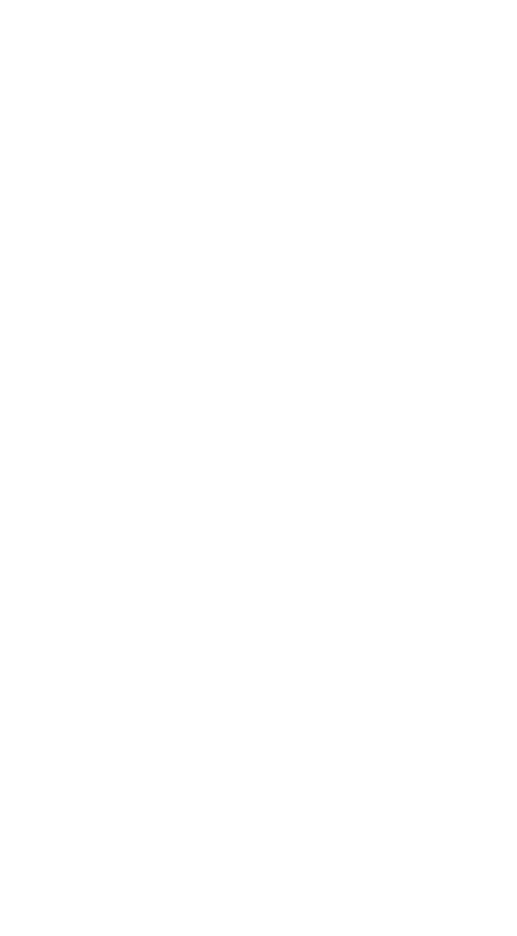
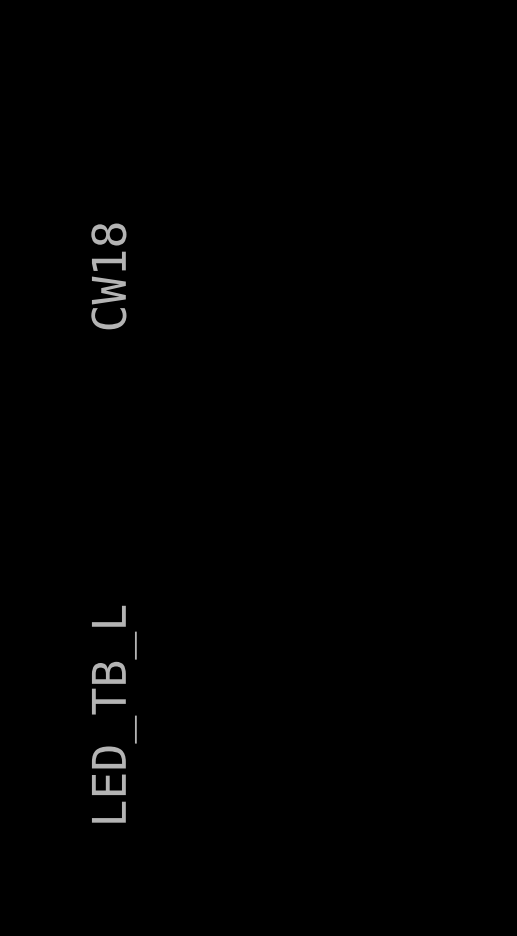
label: none -> CW18 (108, 276)
label: none -> LED_TB_L (114, 714)

